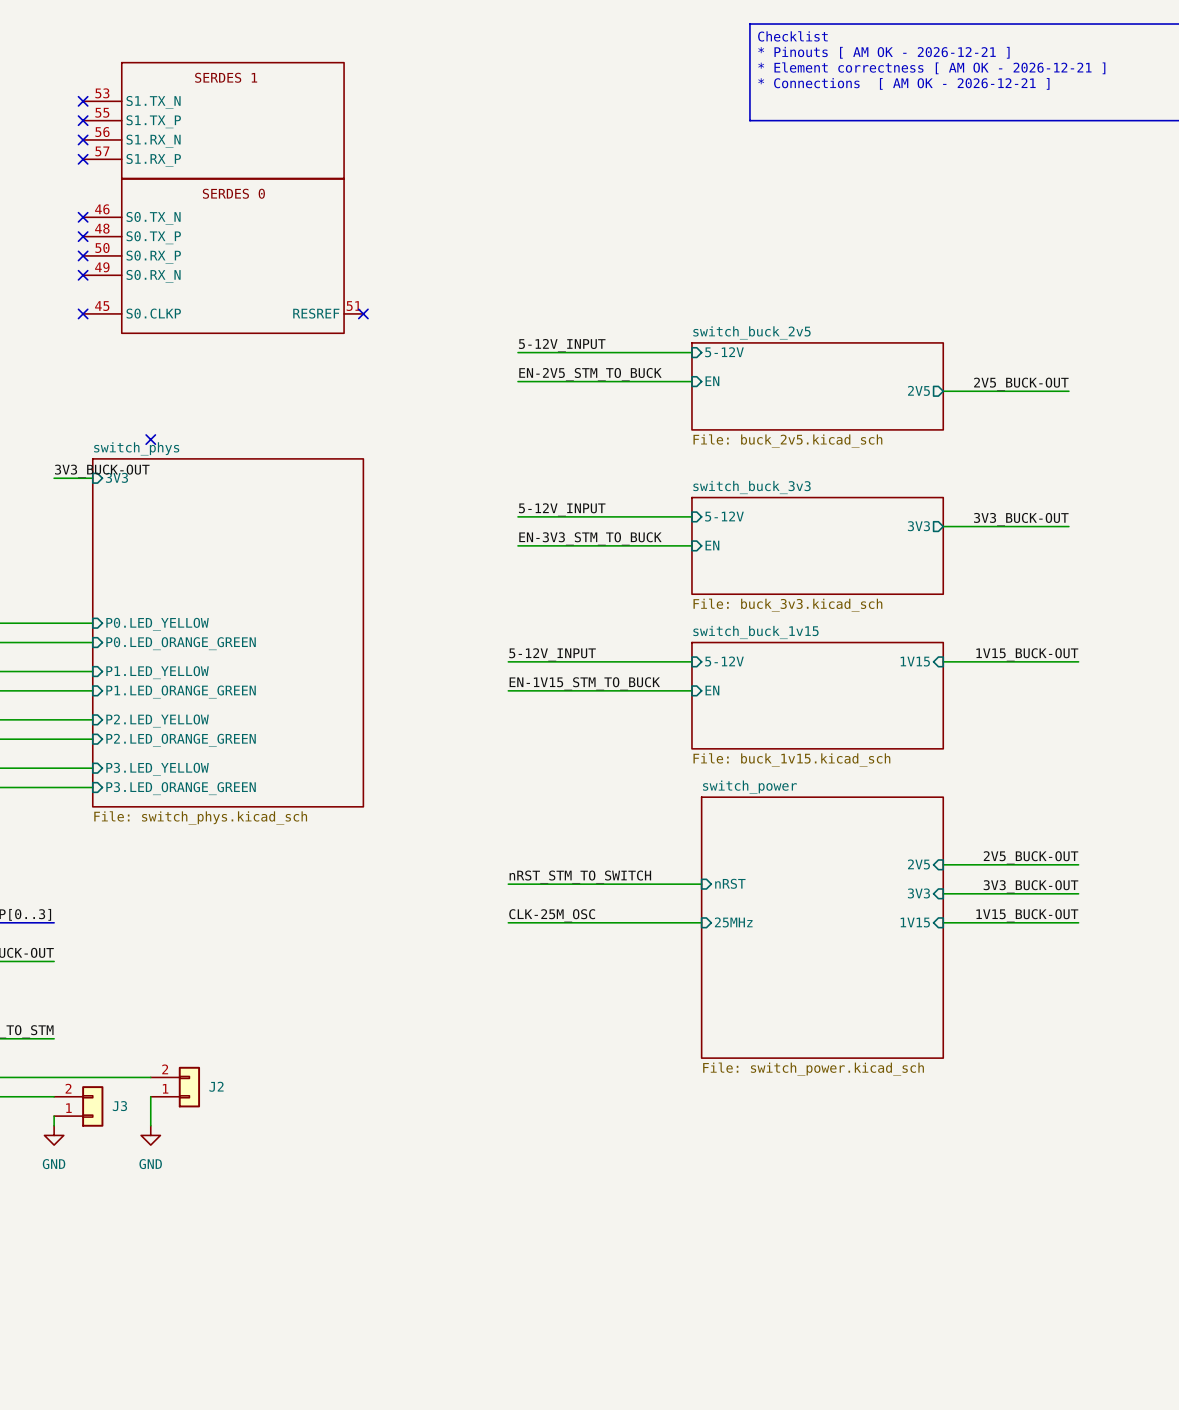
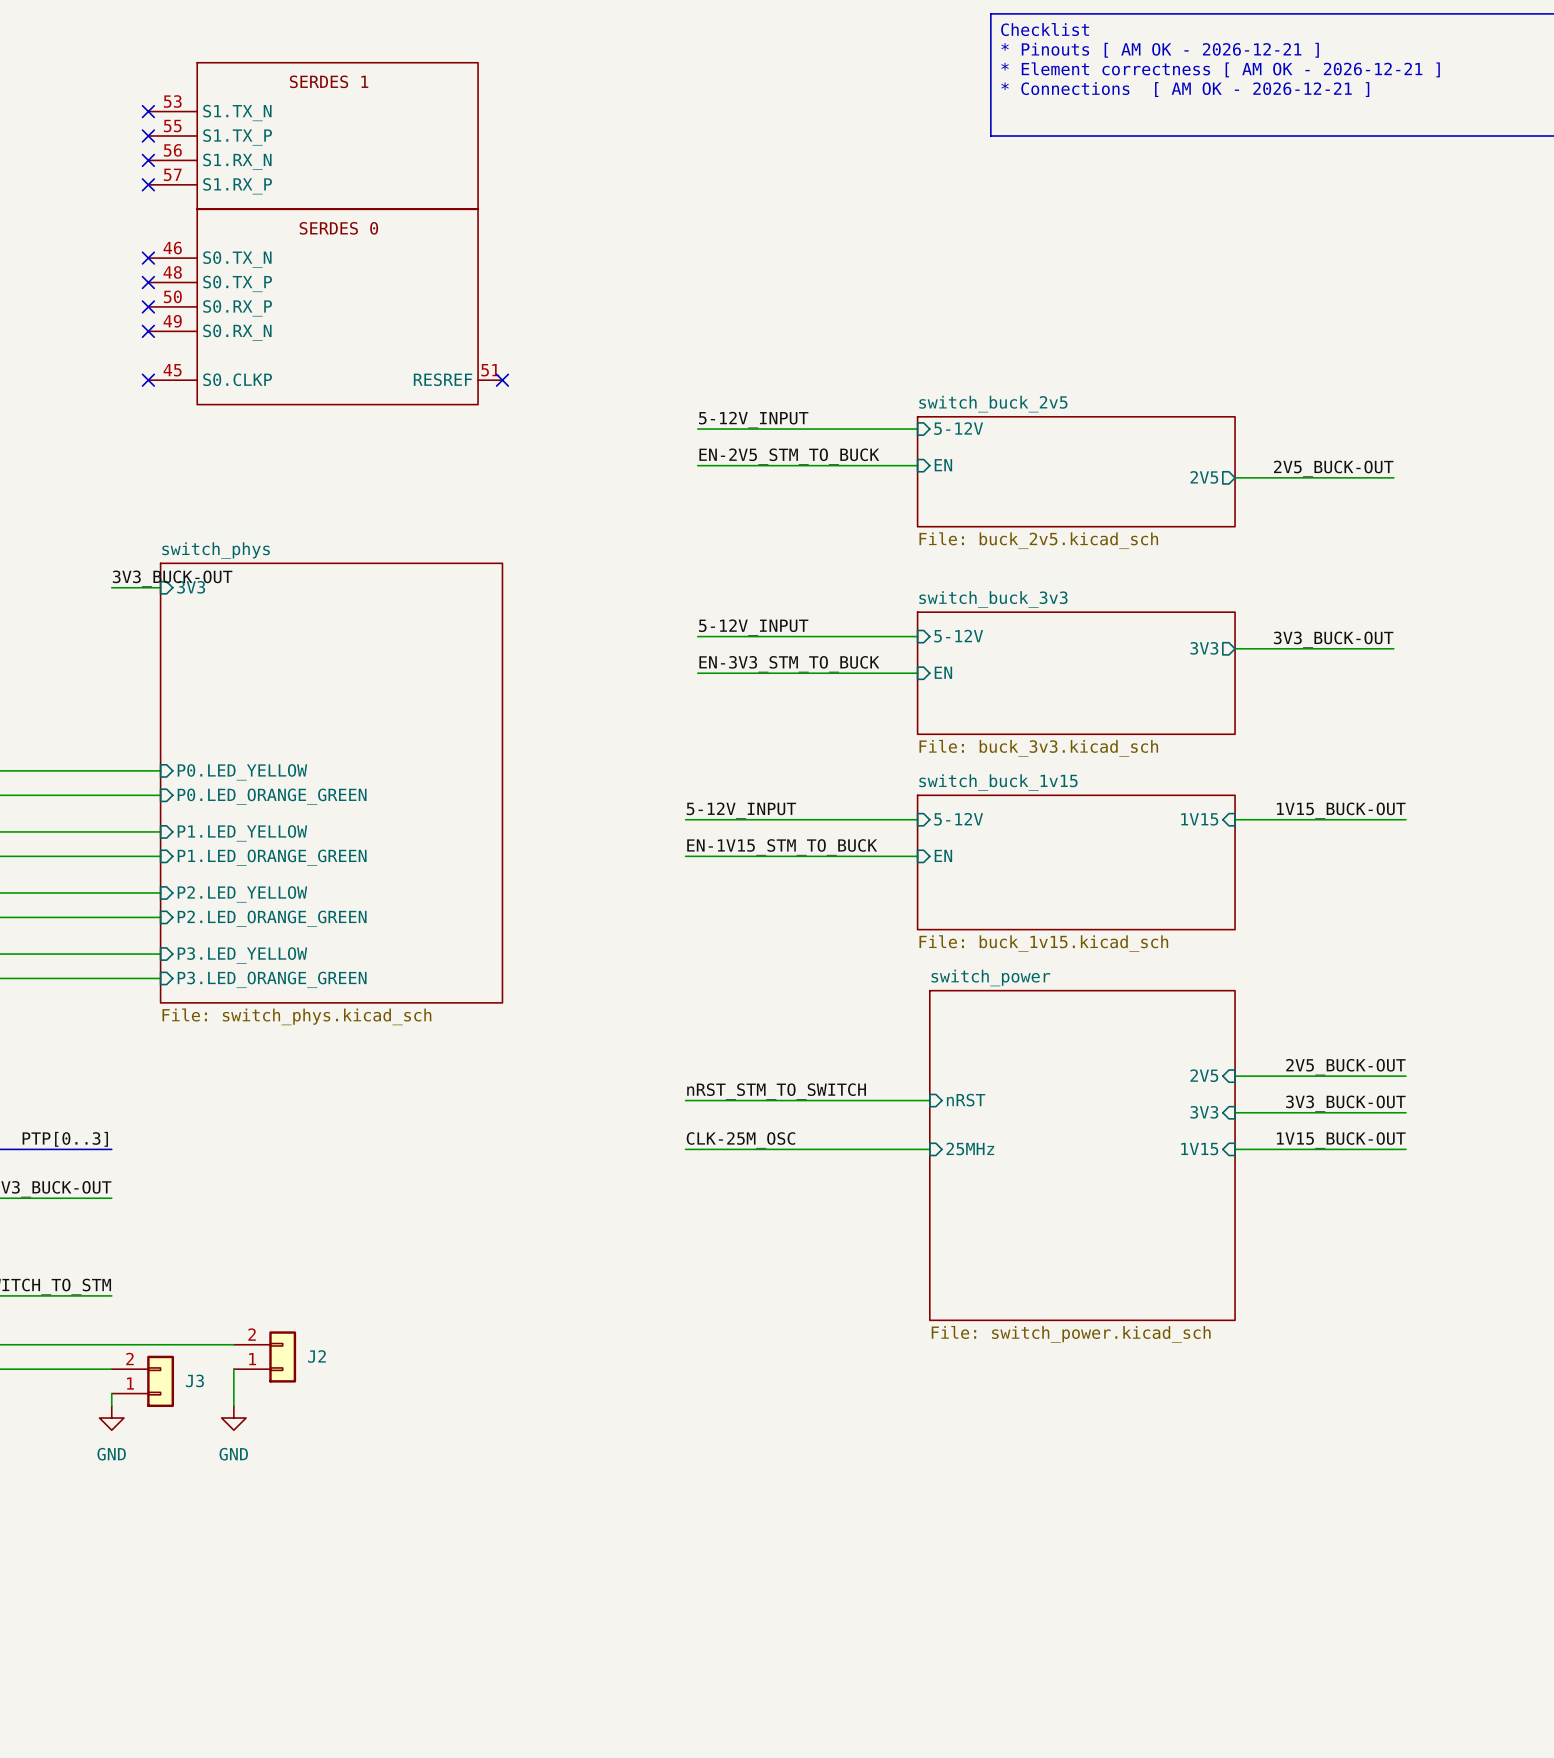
no-connect mark: (150, 439) -> none

